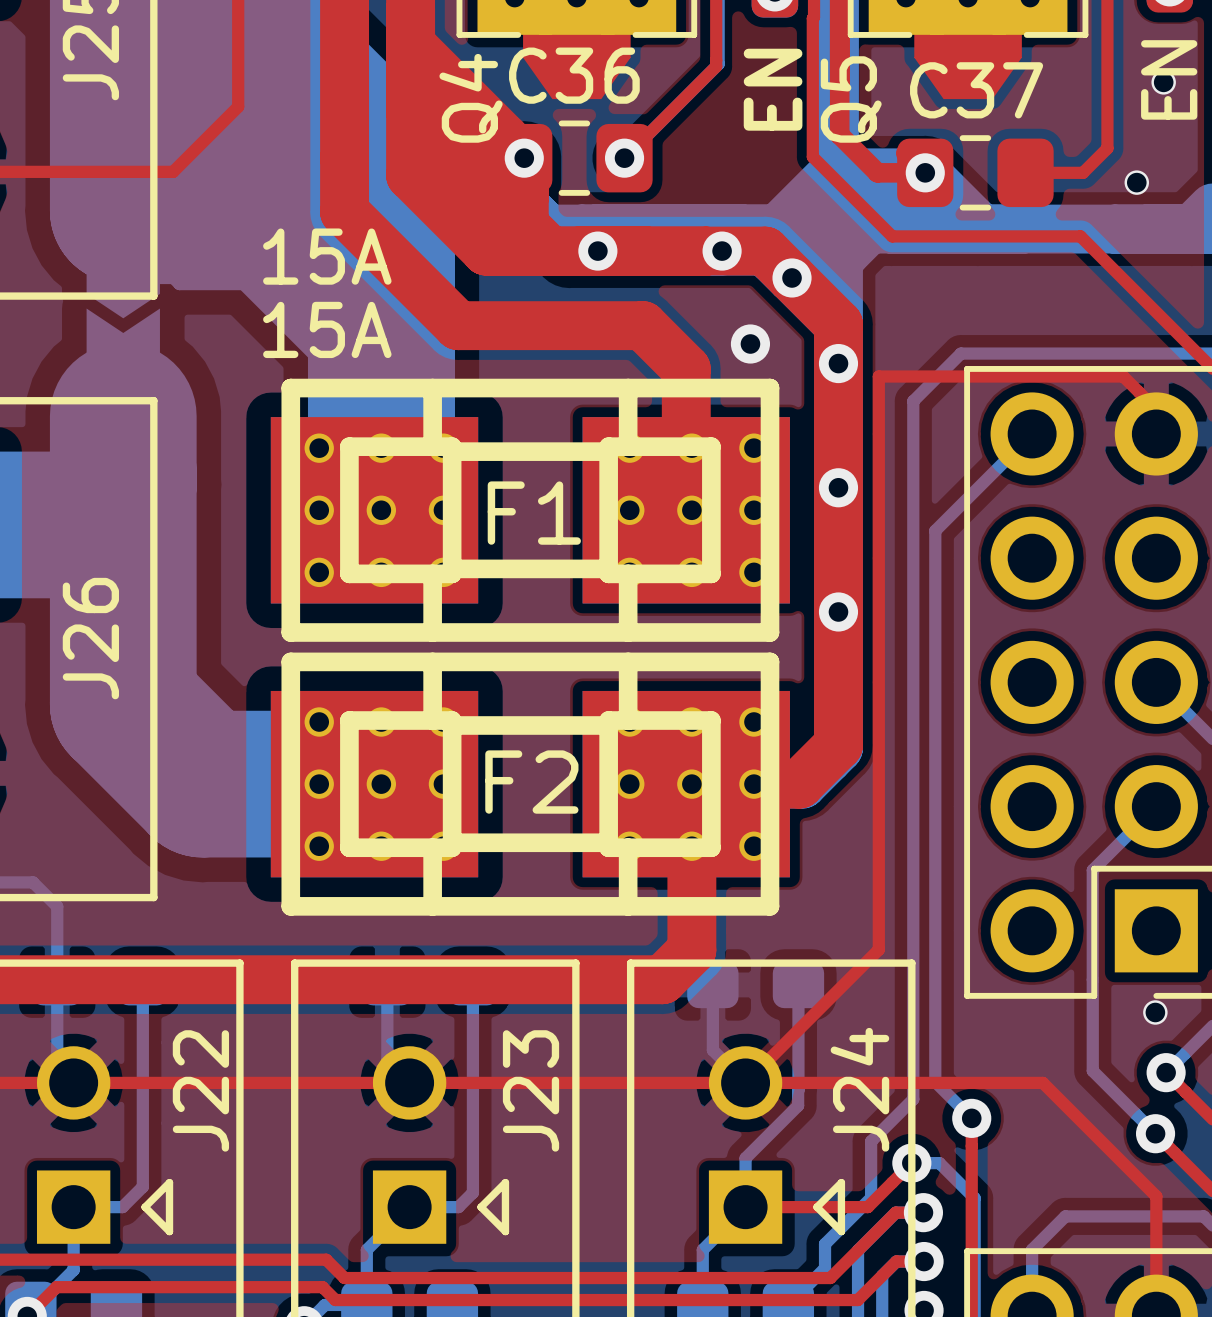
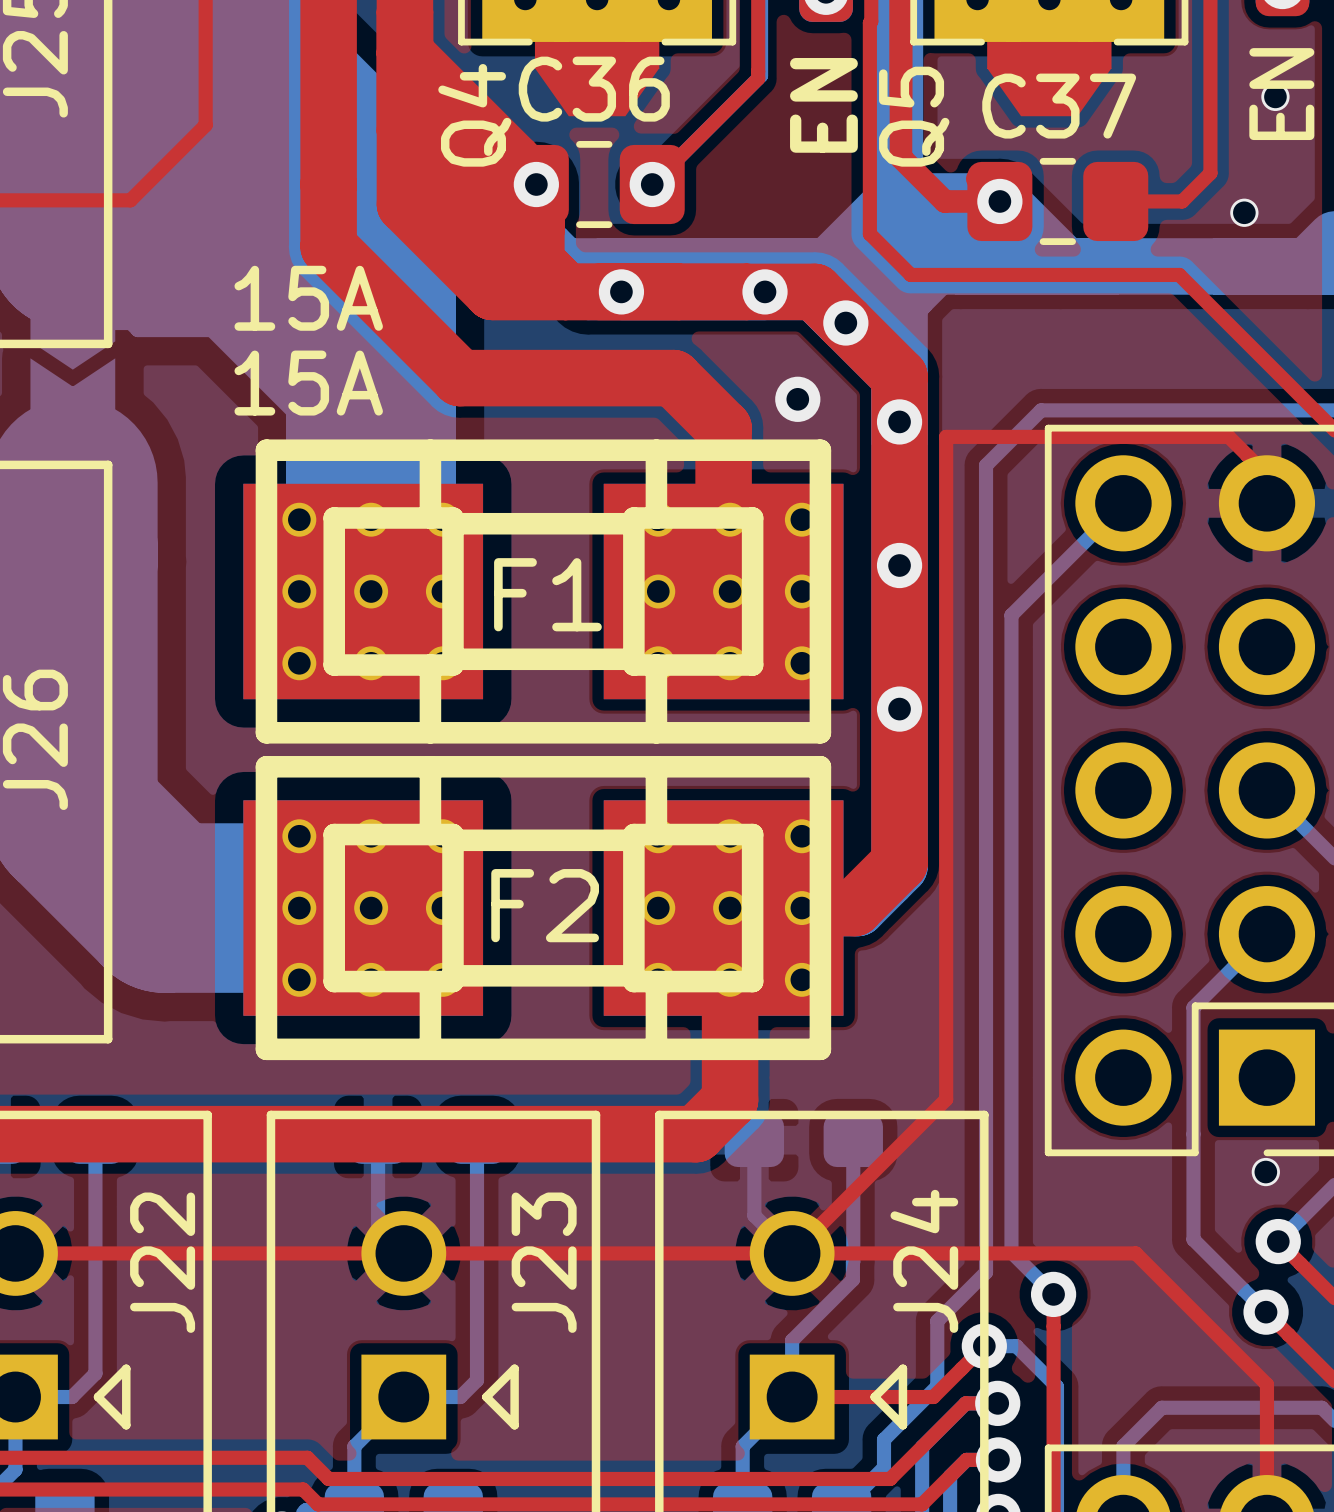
top track: (812, 156) (892, 236) -> (869, 183) (869, 233) (910, 274) (961, 274)

